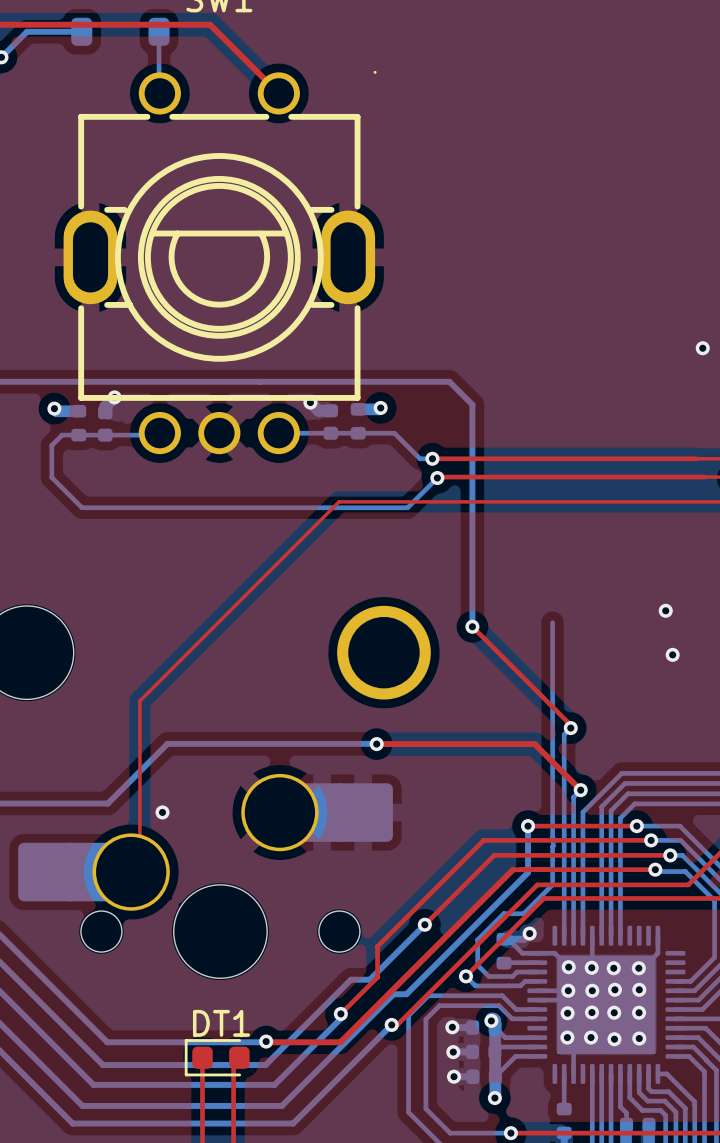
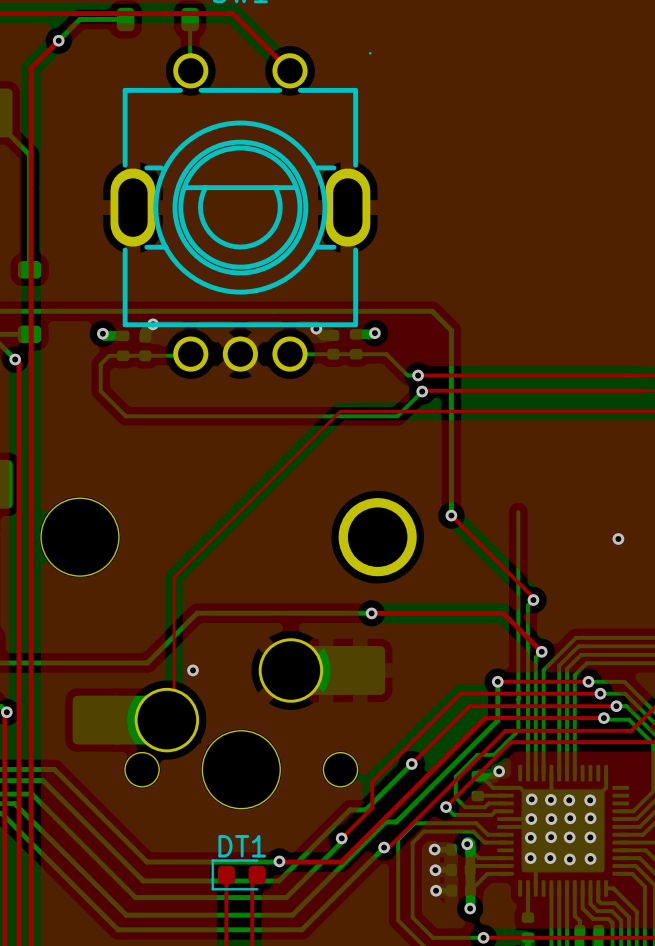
via: (702, 348) -> none
via: (665, 610) -> none

